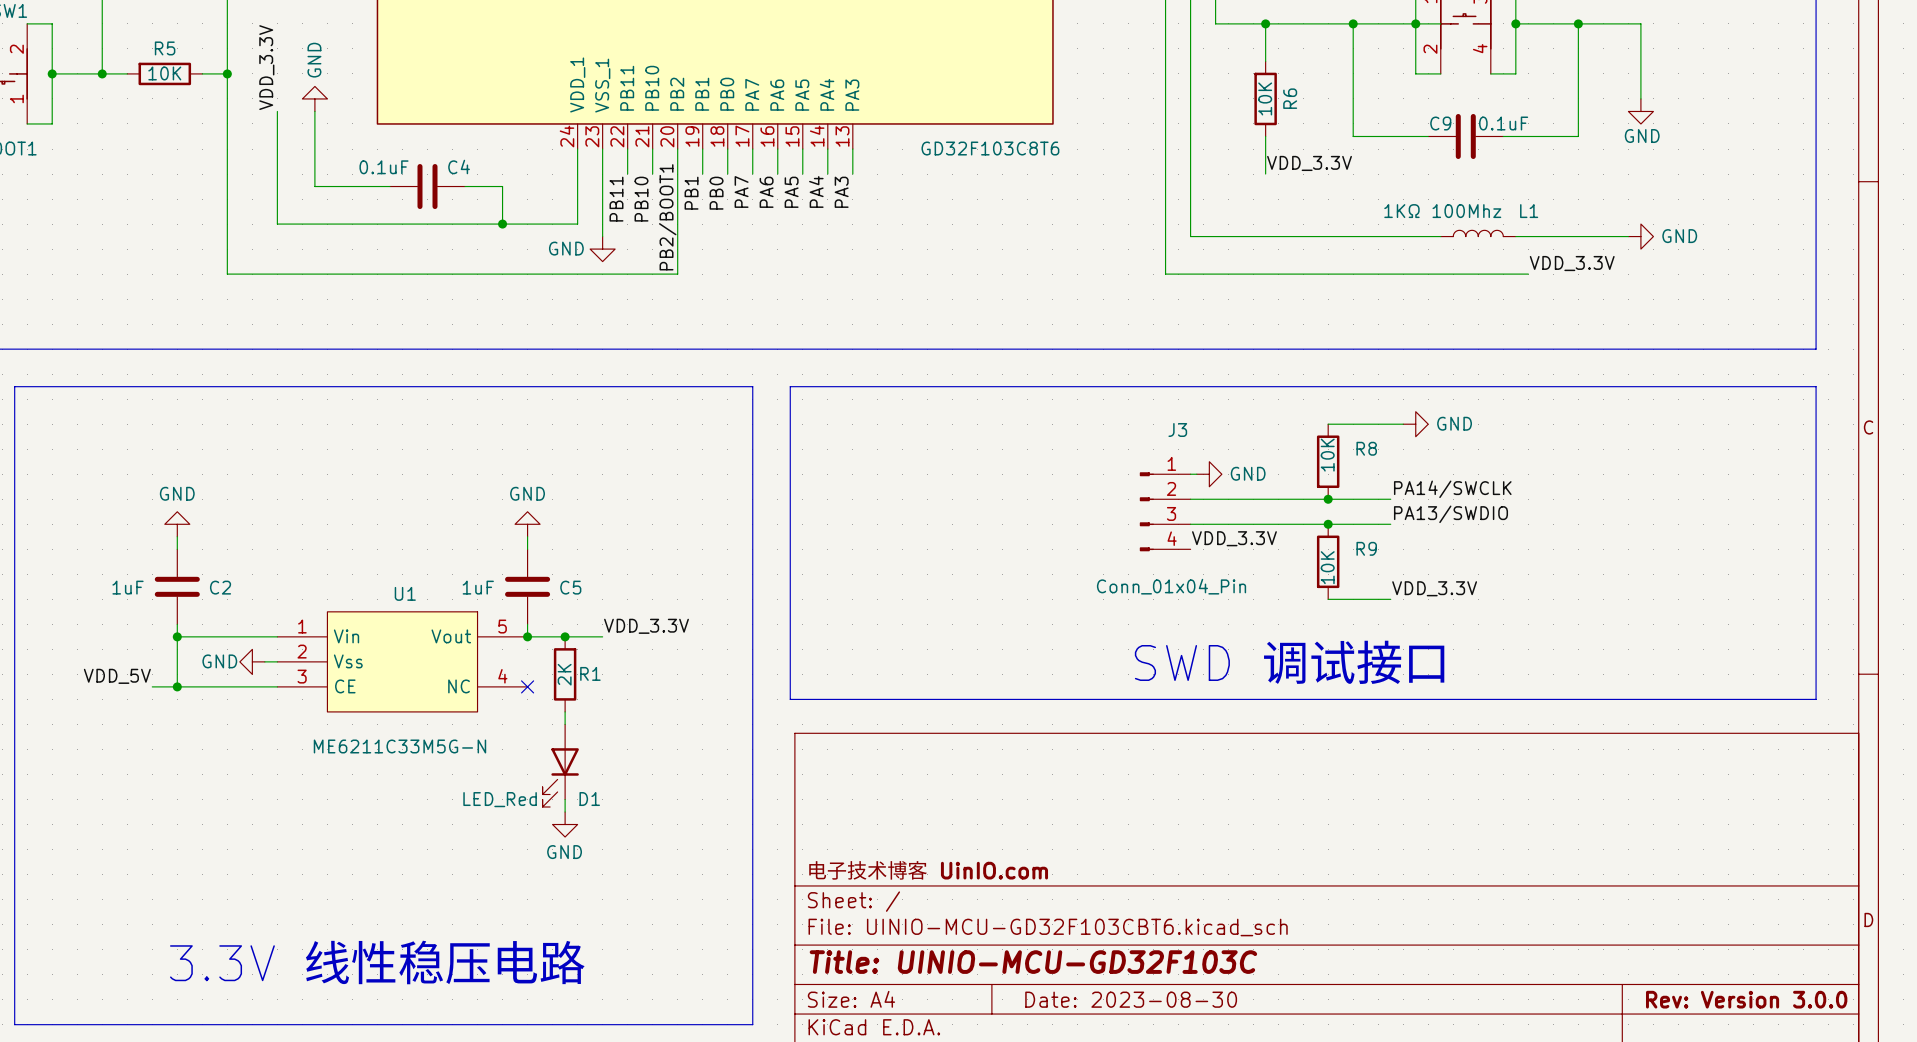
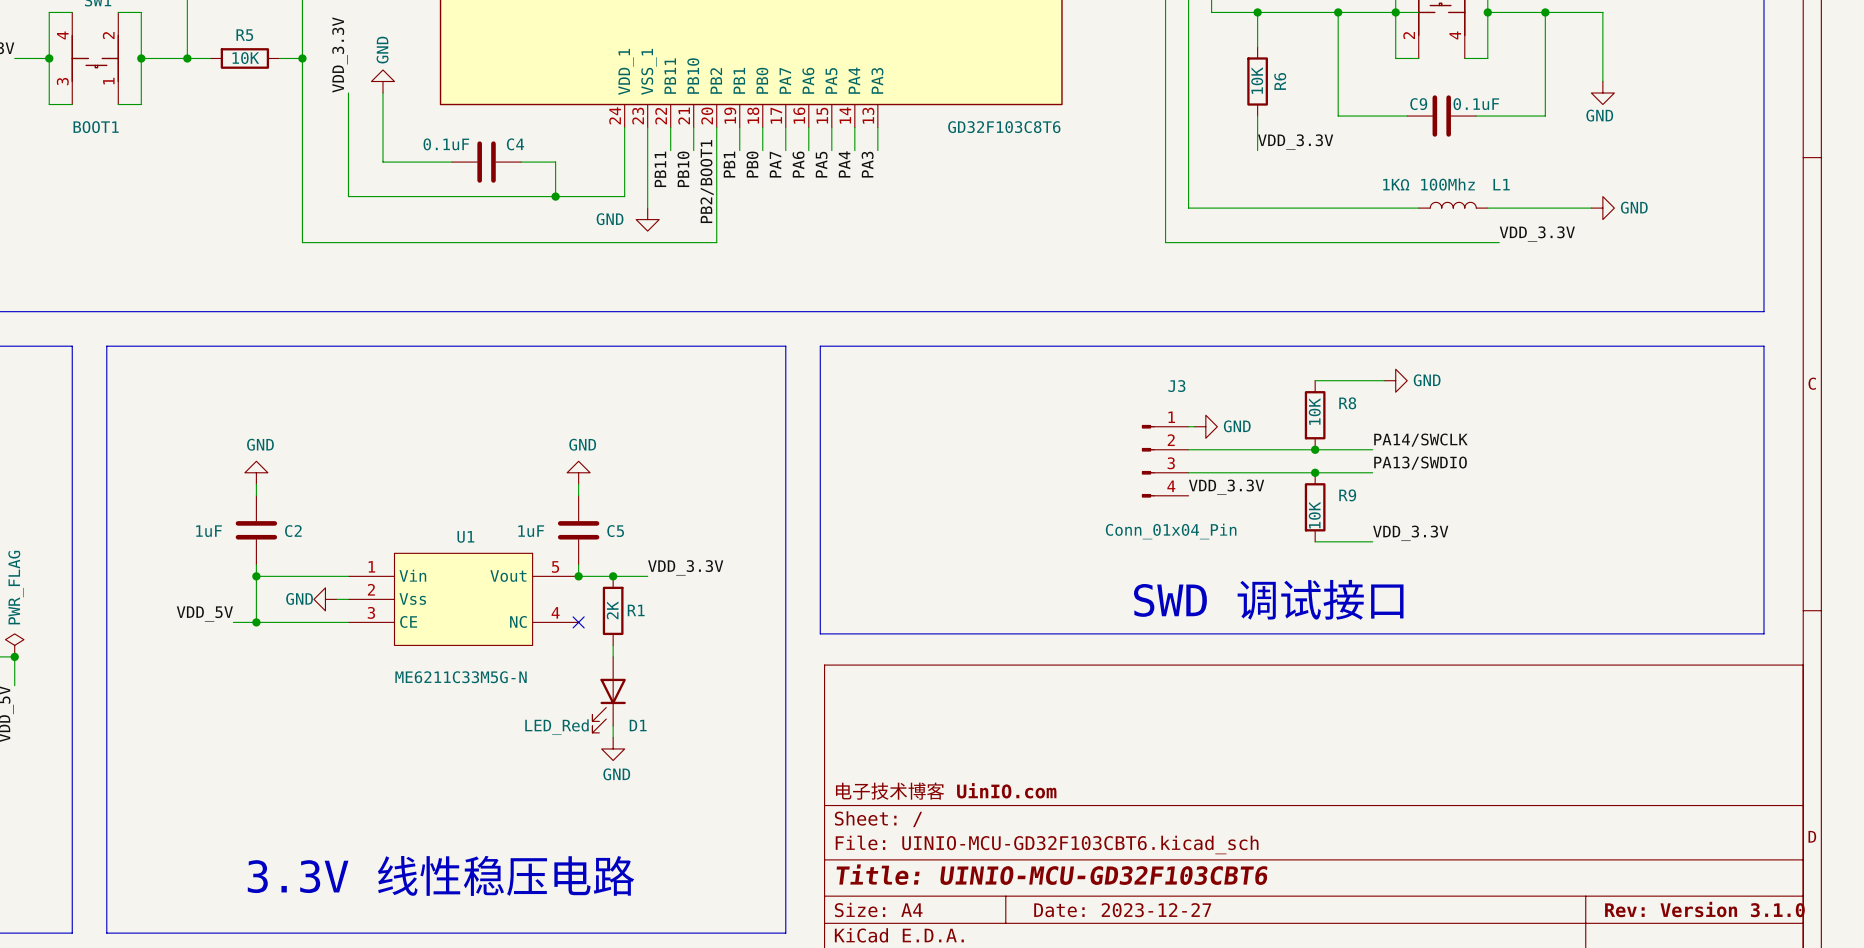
title block: Title: UINIO-MCU-GD32F103C (1033, 962) -> Title: UINIO-MCU-GD32F103CBT6 (1051, 874)
title block: Date: 2023-08-30 (1131, 999) -> Date: 2023-12-27 (1122, 910)
title block: Rev: Version 3.0.0 (1746, 999) -> Rev: Version 3.1.0 (1704, 909)

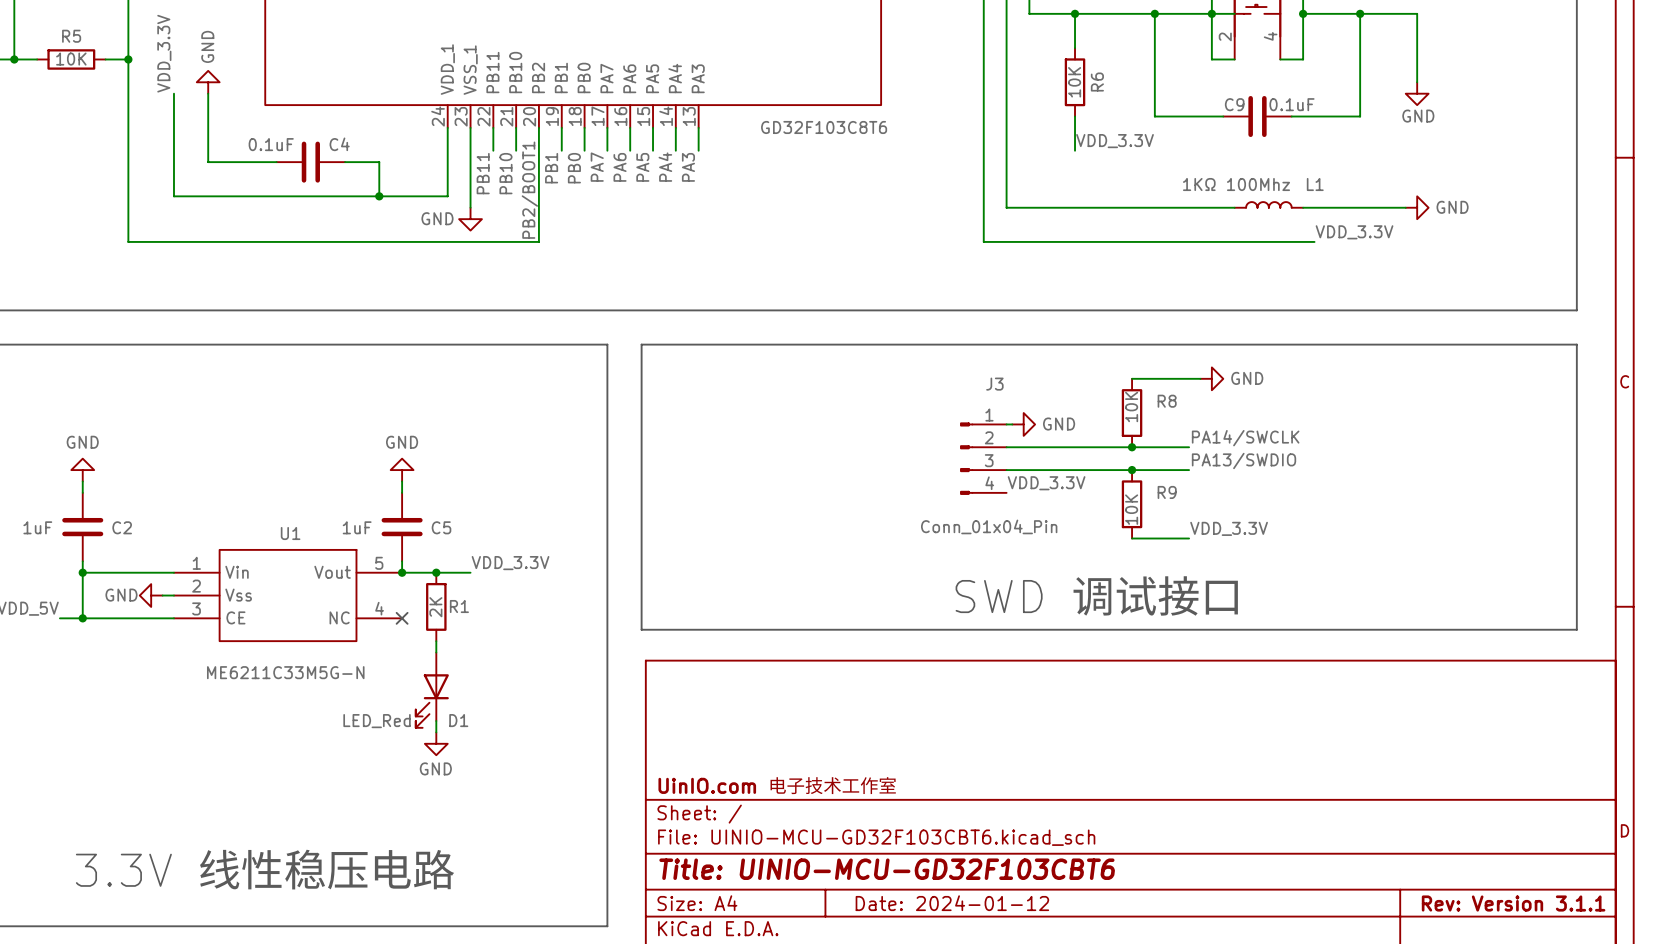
title block: 电子技术博客 UinIO.com (946, 791) -> UinIO.com 电子技术工作室 (777, 785)
title block: Rev: Version 3.1.0 (1704, 909) -> Rev: Version 3.1.1 (1513, 903)
title block: Date: 2023-12-27 (1122, 910) -> Date: 2024-01-12 (952, 903)

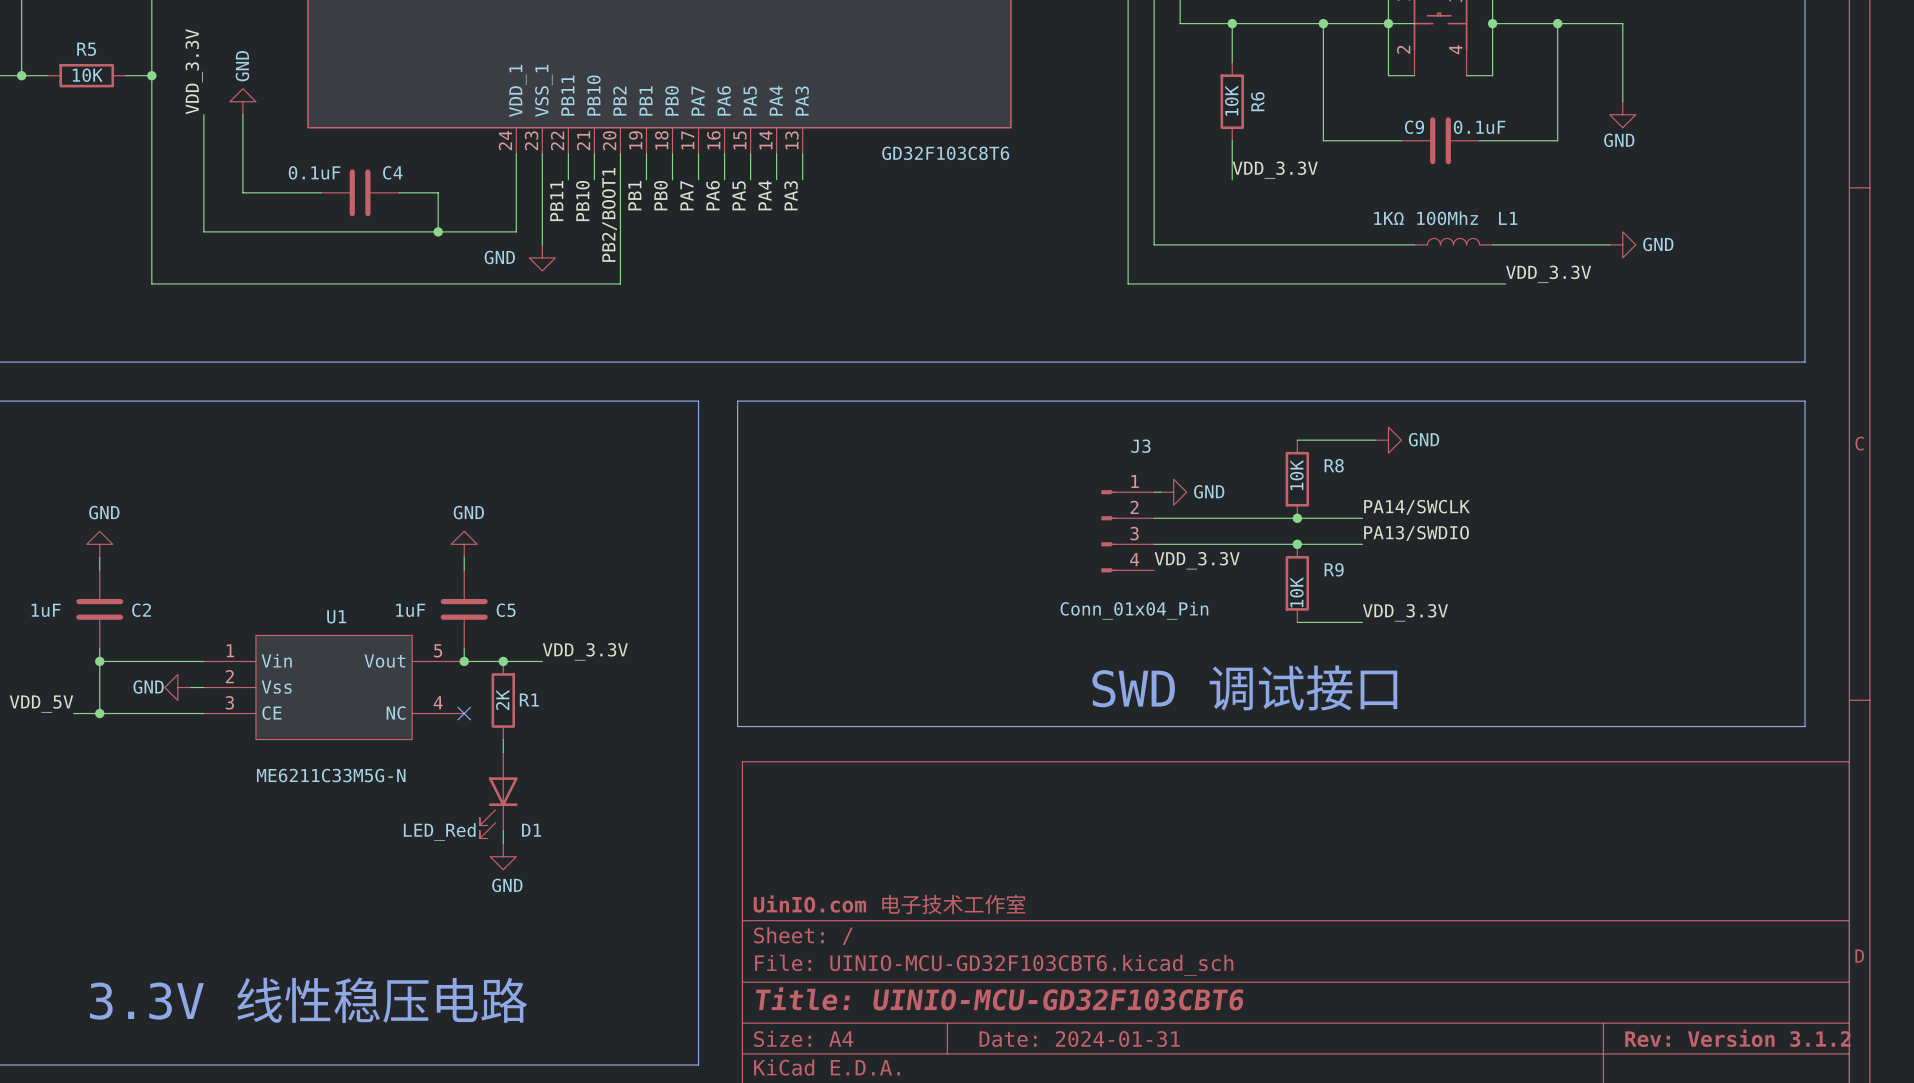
title block: Date: 2024-01-12 (952, 903) -> Date: 2024-01-31 (1079, 1039)
title block: Rev: Version 3.1.1 (1513, 903) -> Rev: Version 3.1.2 (1737, 1038)

